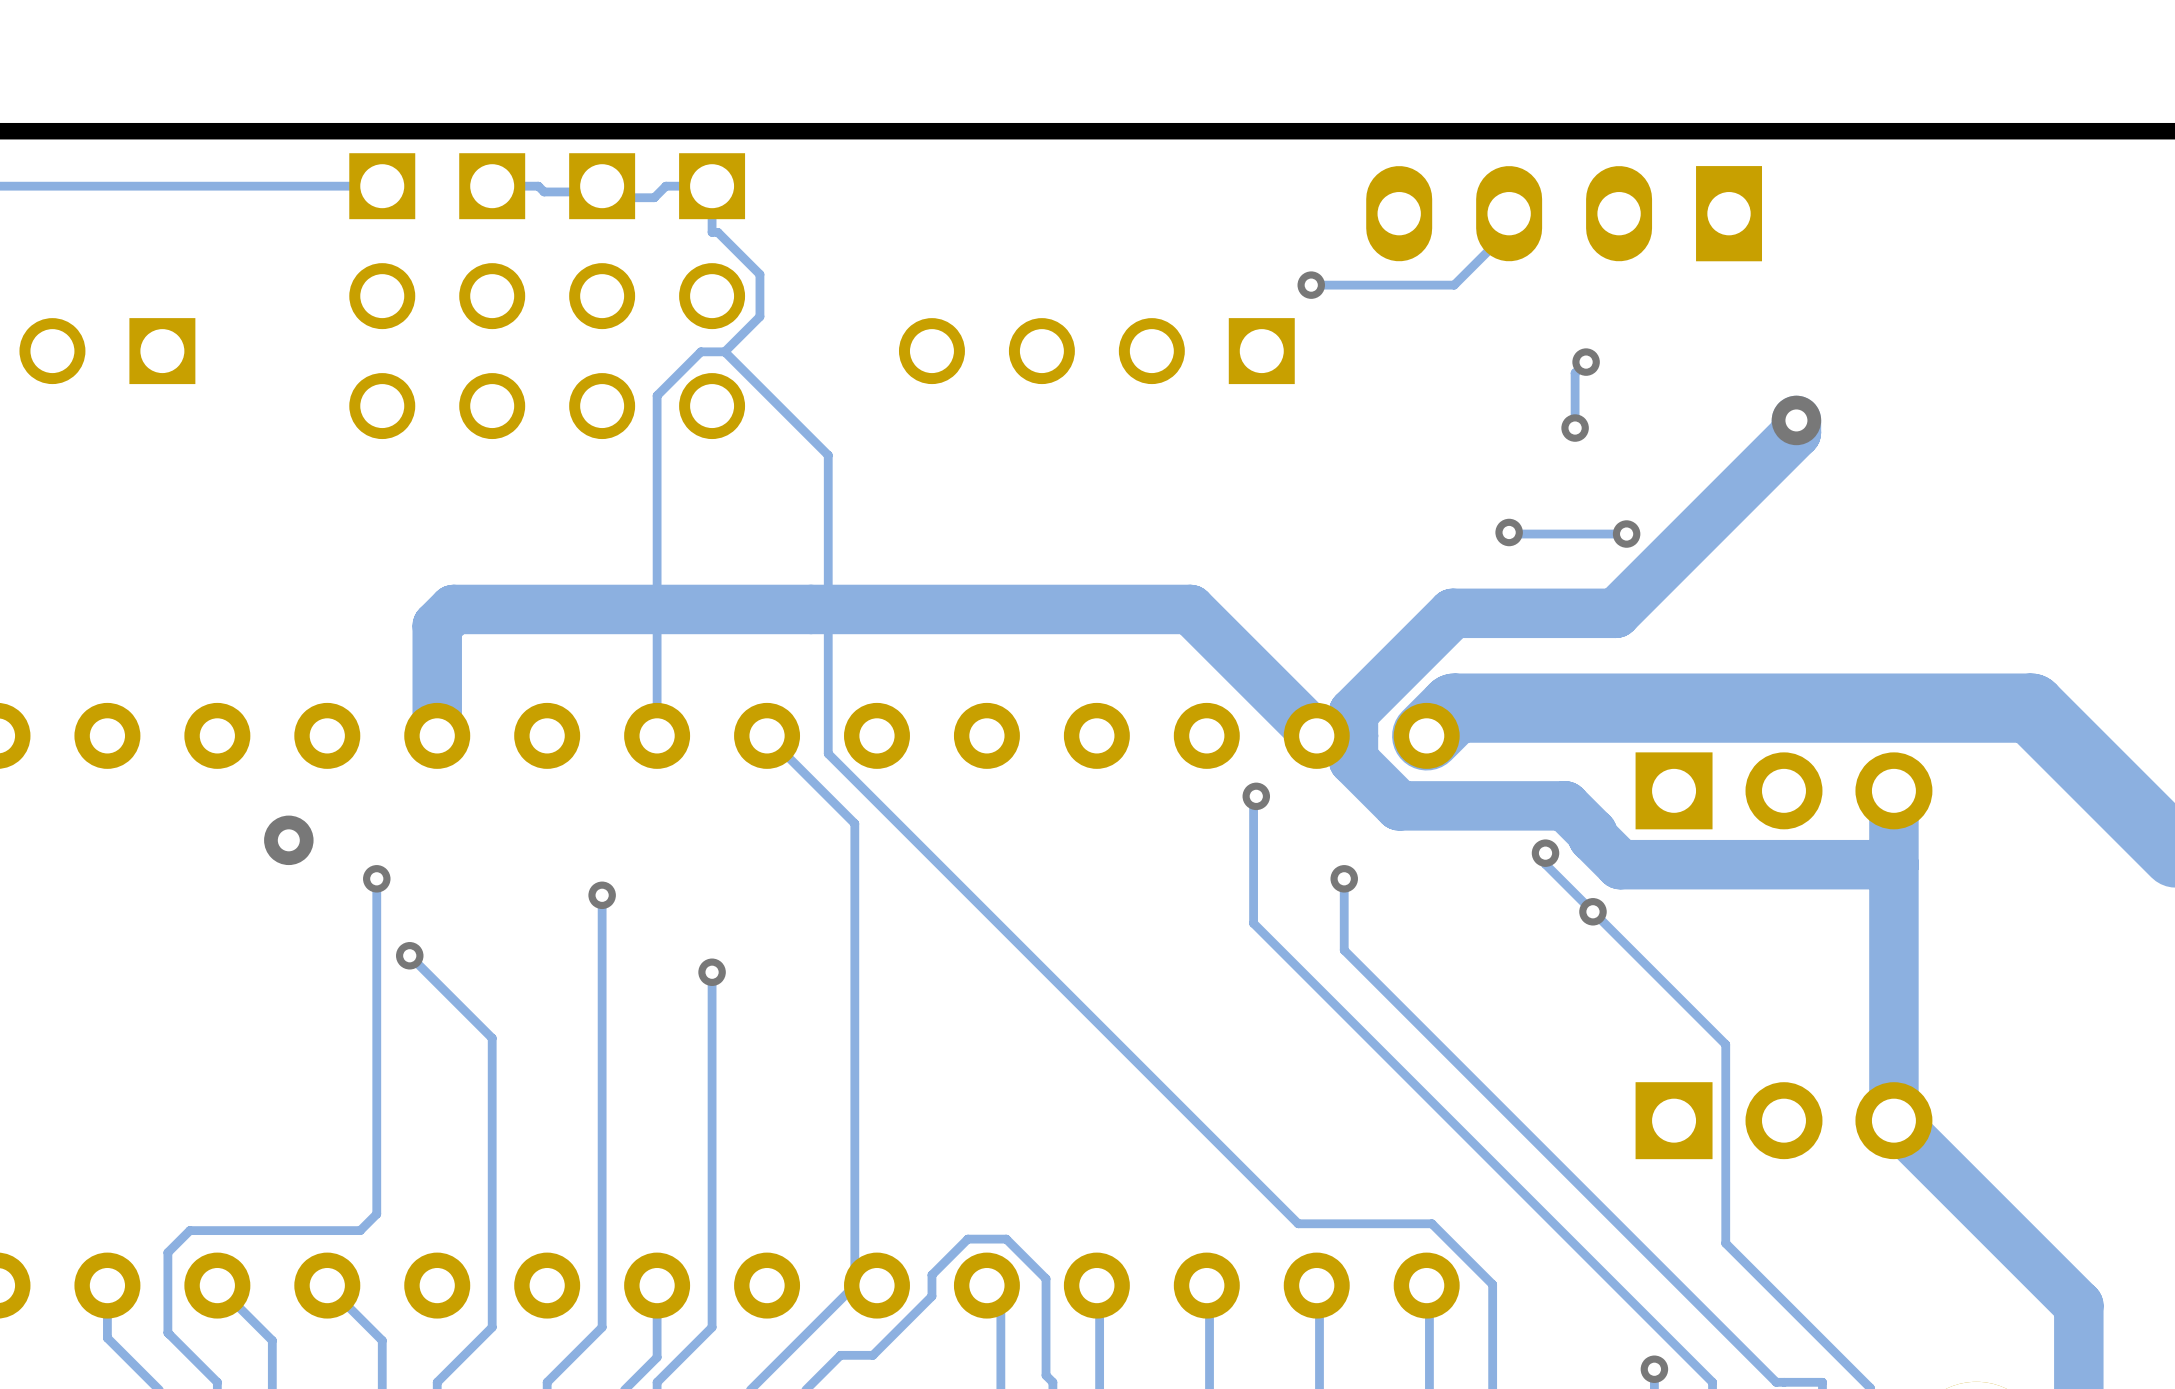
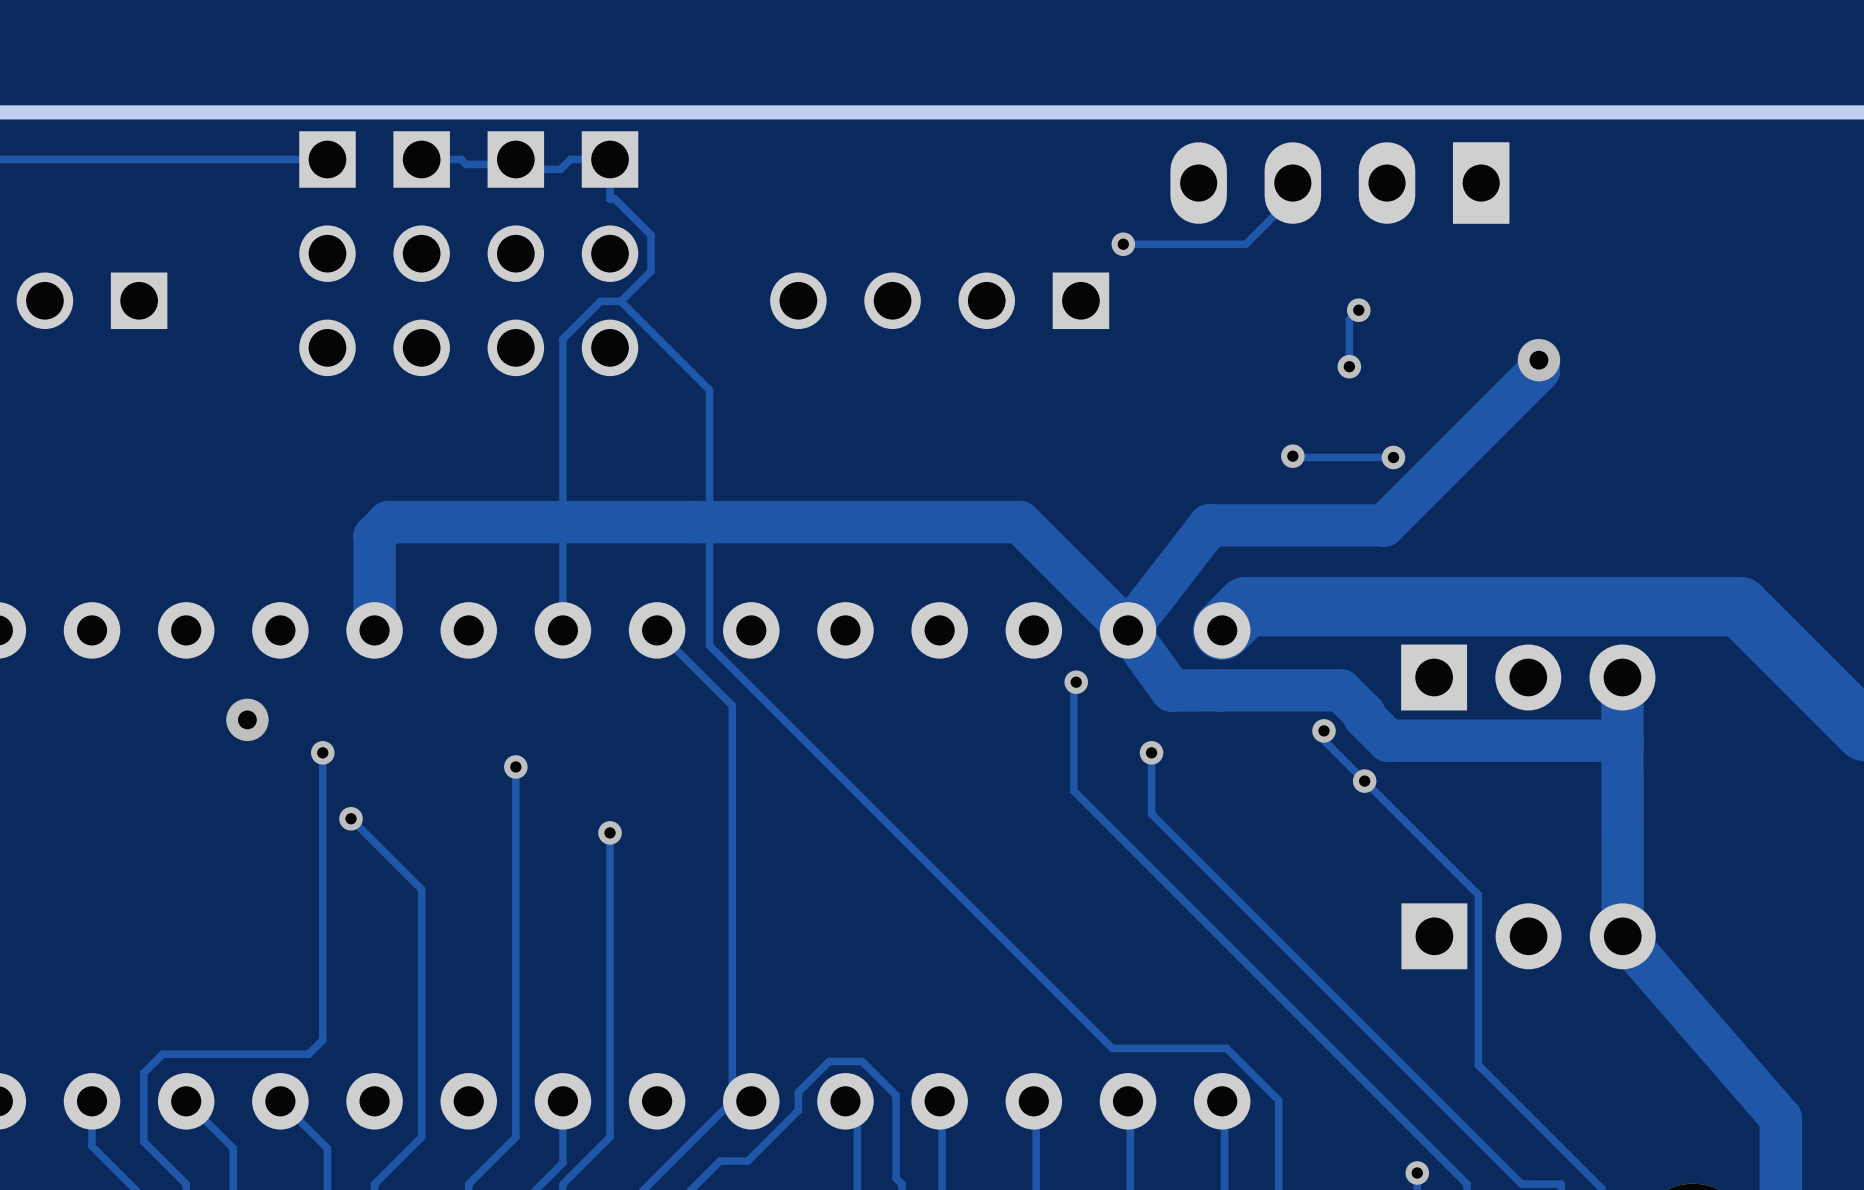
track: (1452, 613) (1353, 712) (1353, 759) (1399, 805) (1423, 805) -> (1244, 525) (1209, 525) (1128, 630) (1171, 690) (1219, 690)
track: (1893, 864) (1893, 1120) (2078, 1305) -> (1622, 740) (1622, 936) (1780, 1118)
part position: (1783, 1120) -> (1528, 936)

